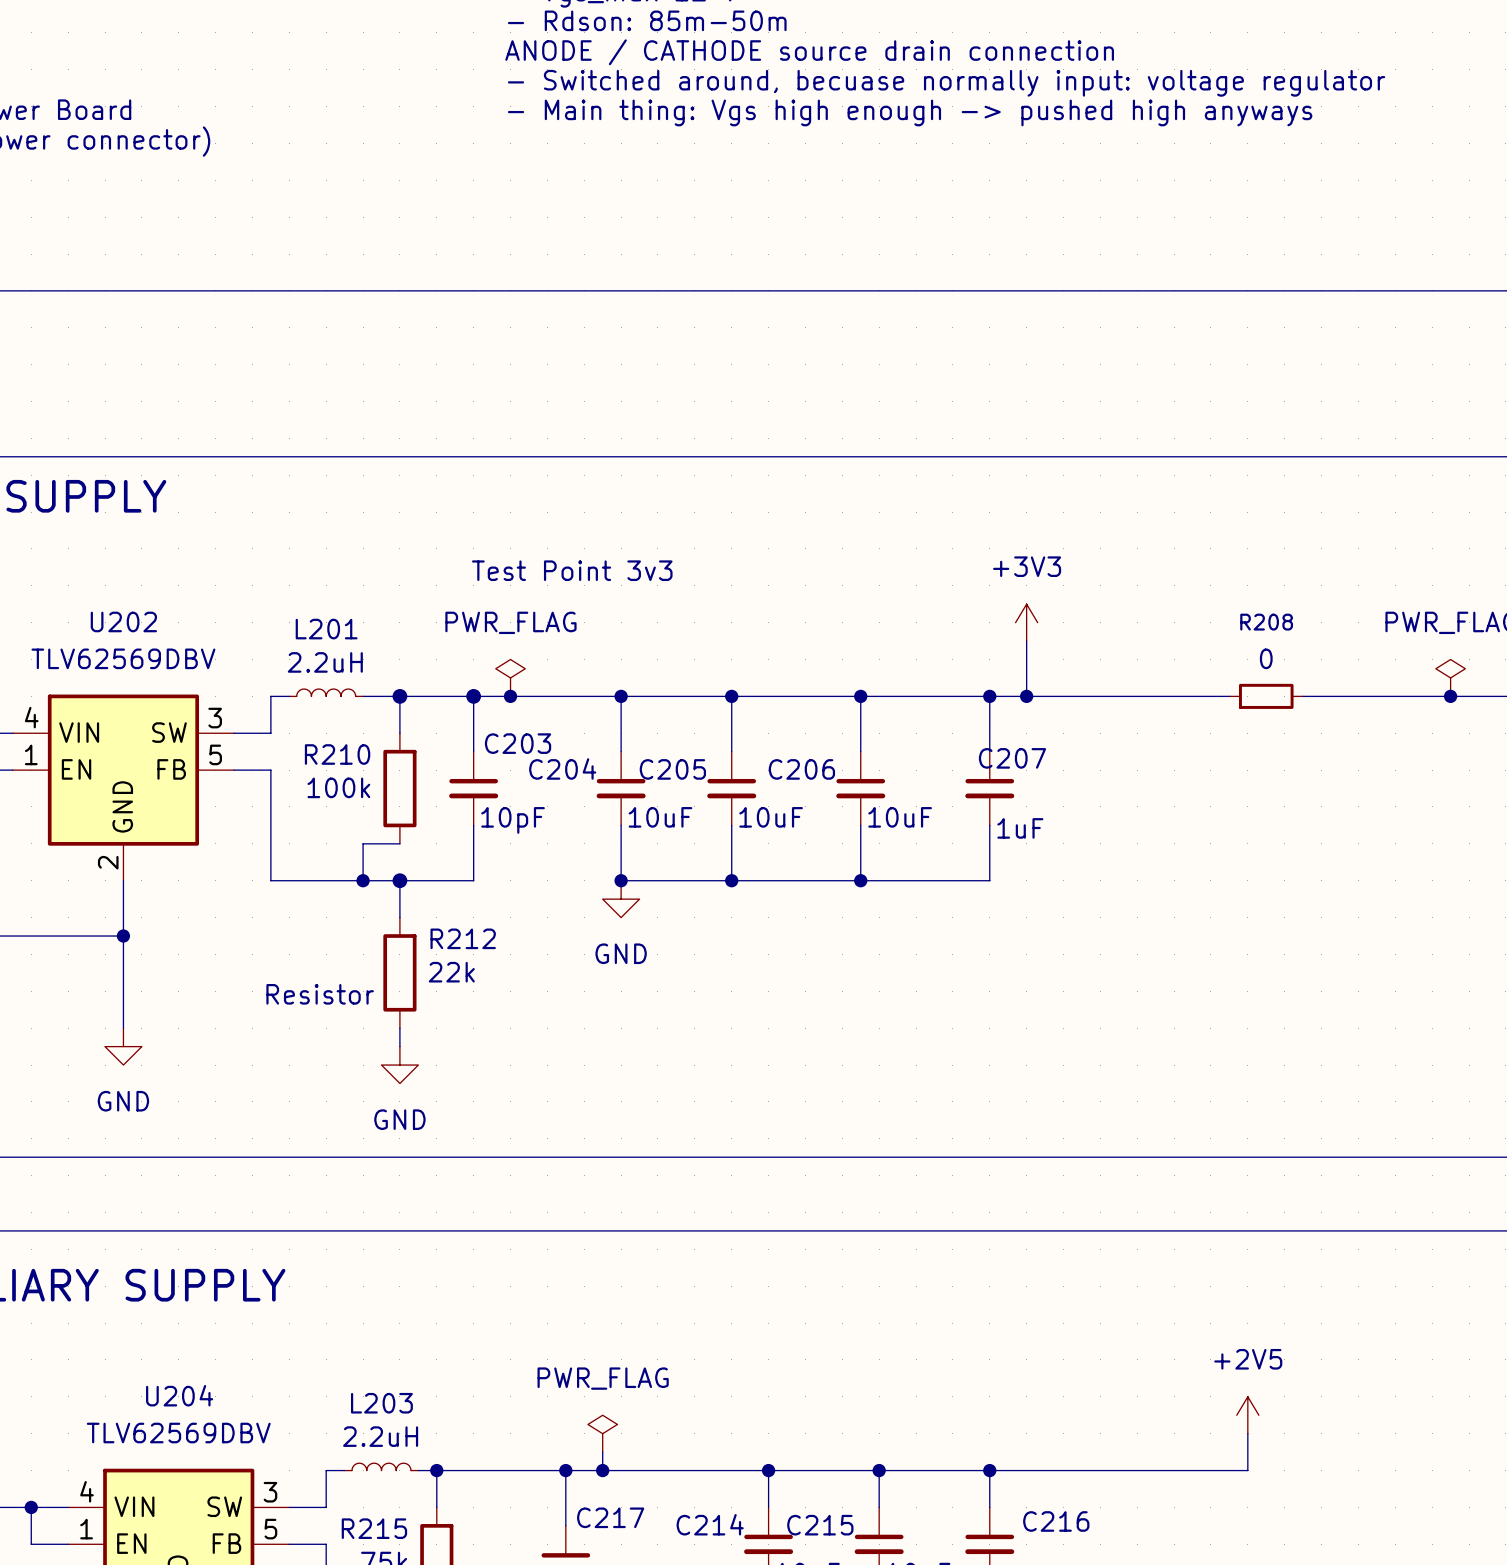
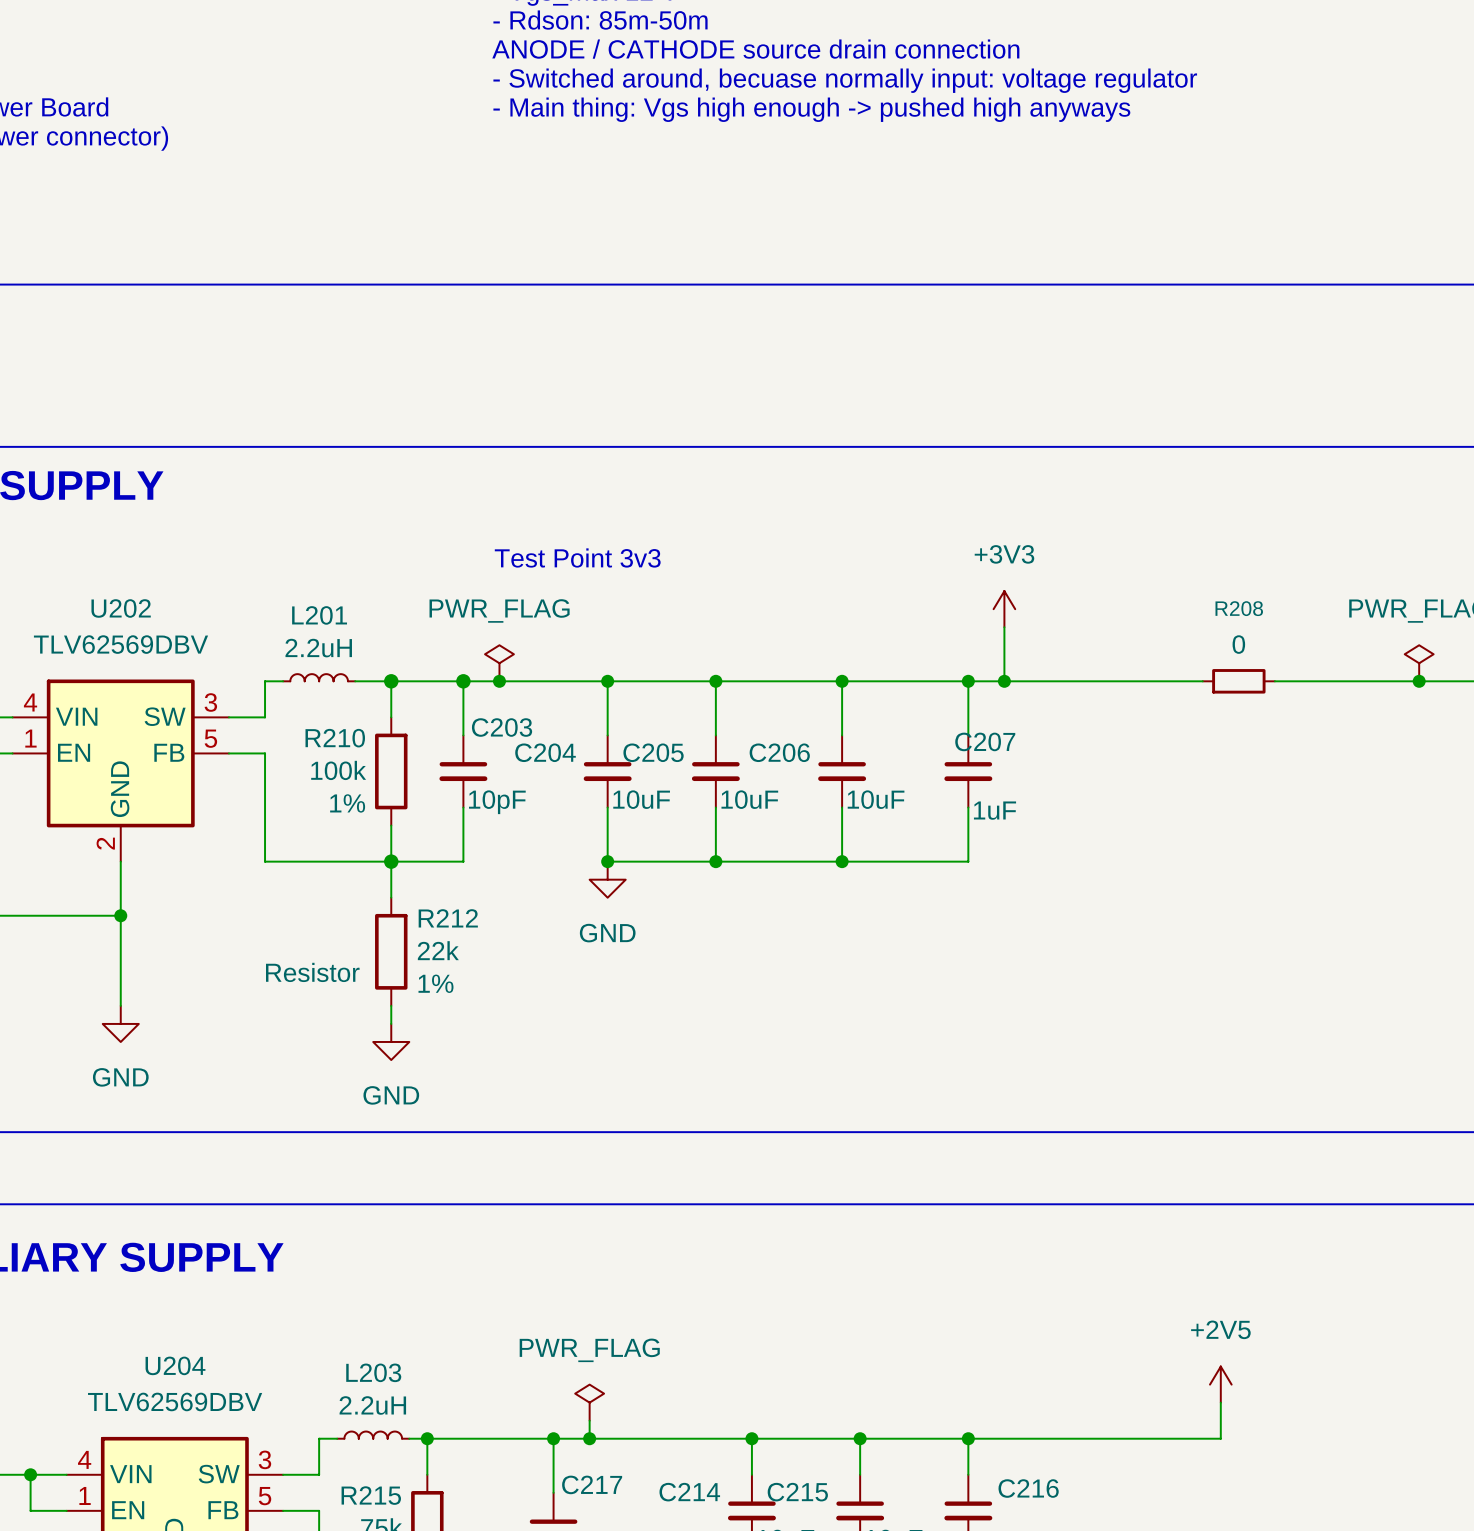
R210 text: none -> 1% (347, 803)
wire: (399, 843) (363, 843) (363, 880) -> (391, 825) (391, 861)
junction: (363, 880) -> none
R212 text: none -> 1% (435, 983)

